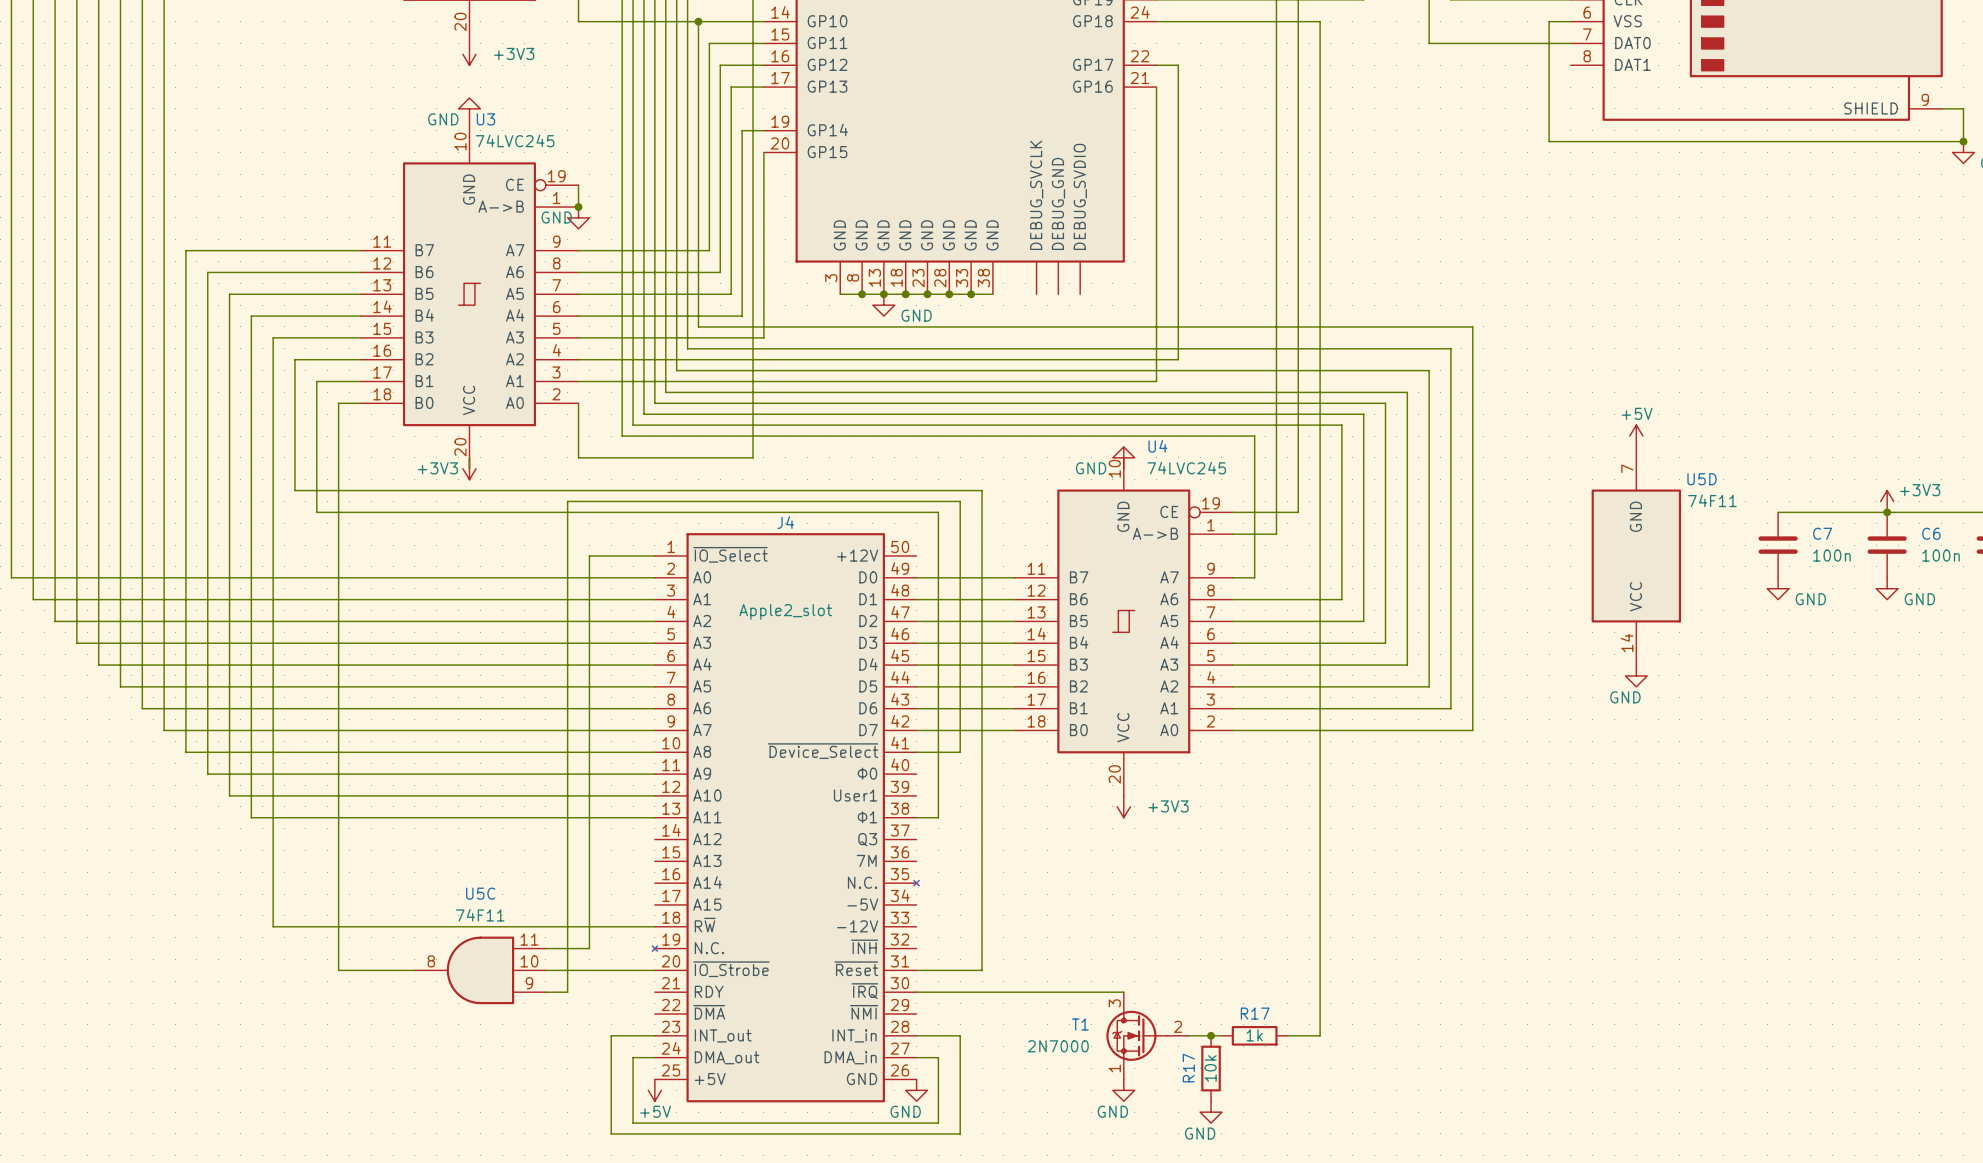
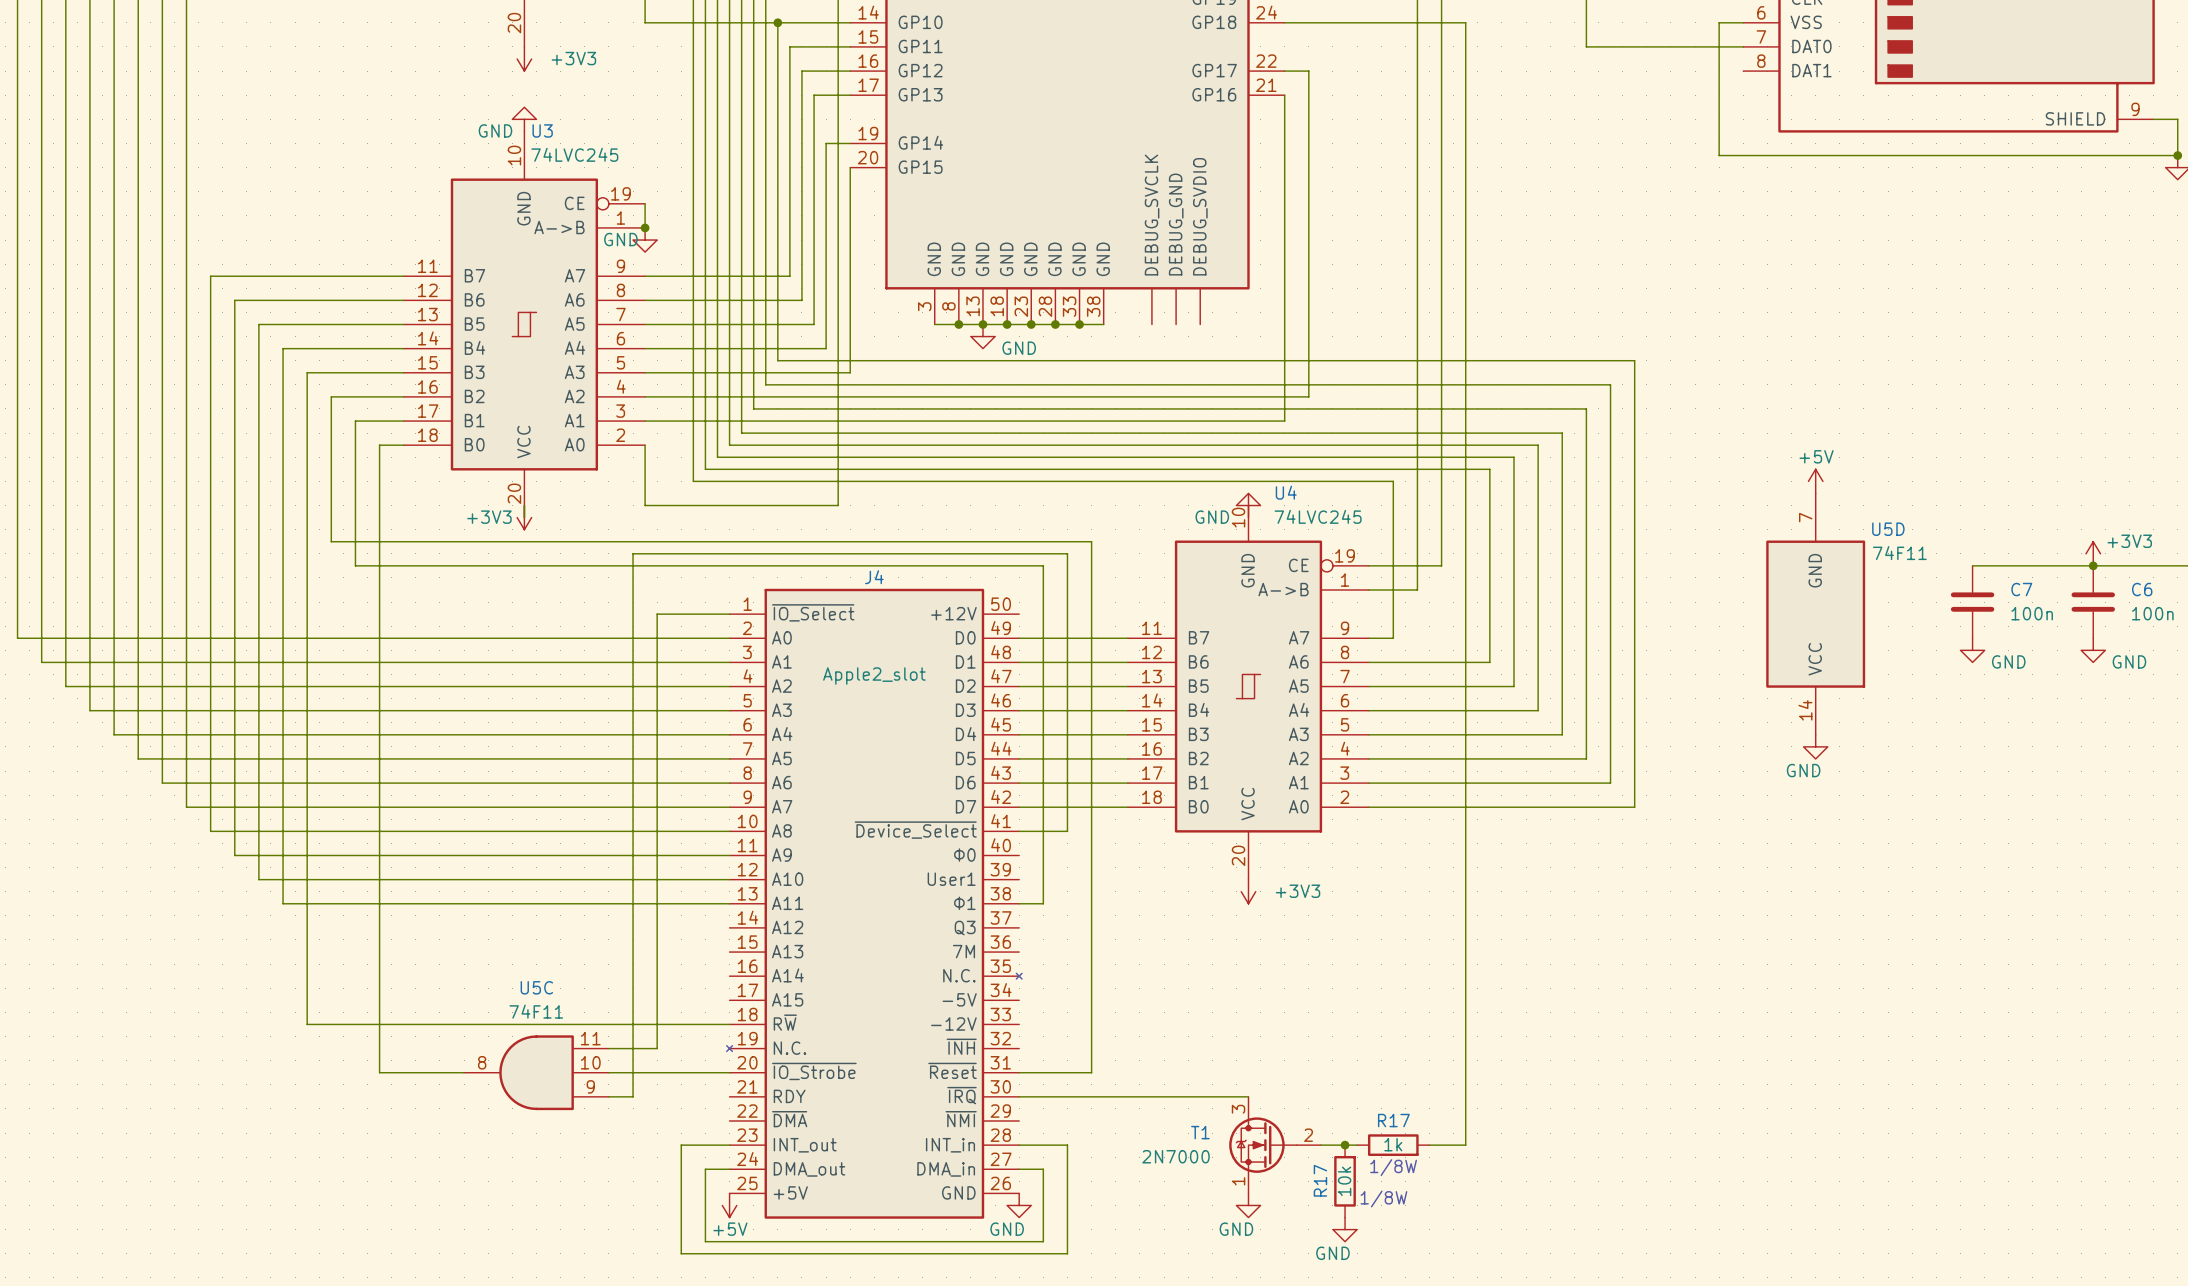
text: none -> 1/8W (1393, 1167)
text: none -> 1/8W (1383, 1198)

